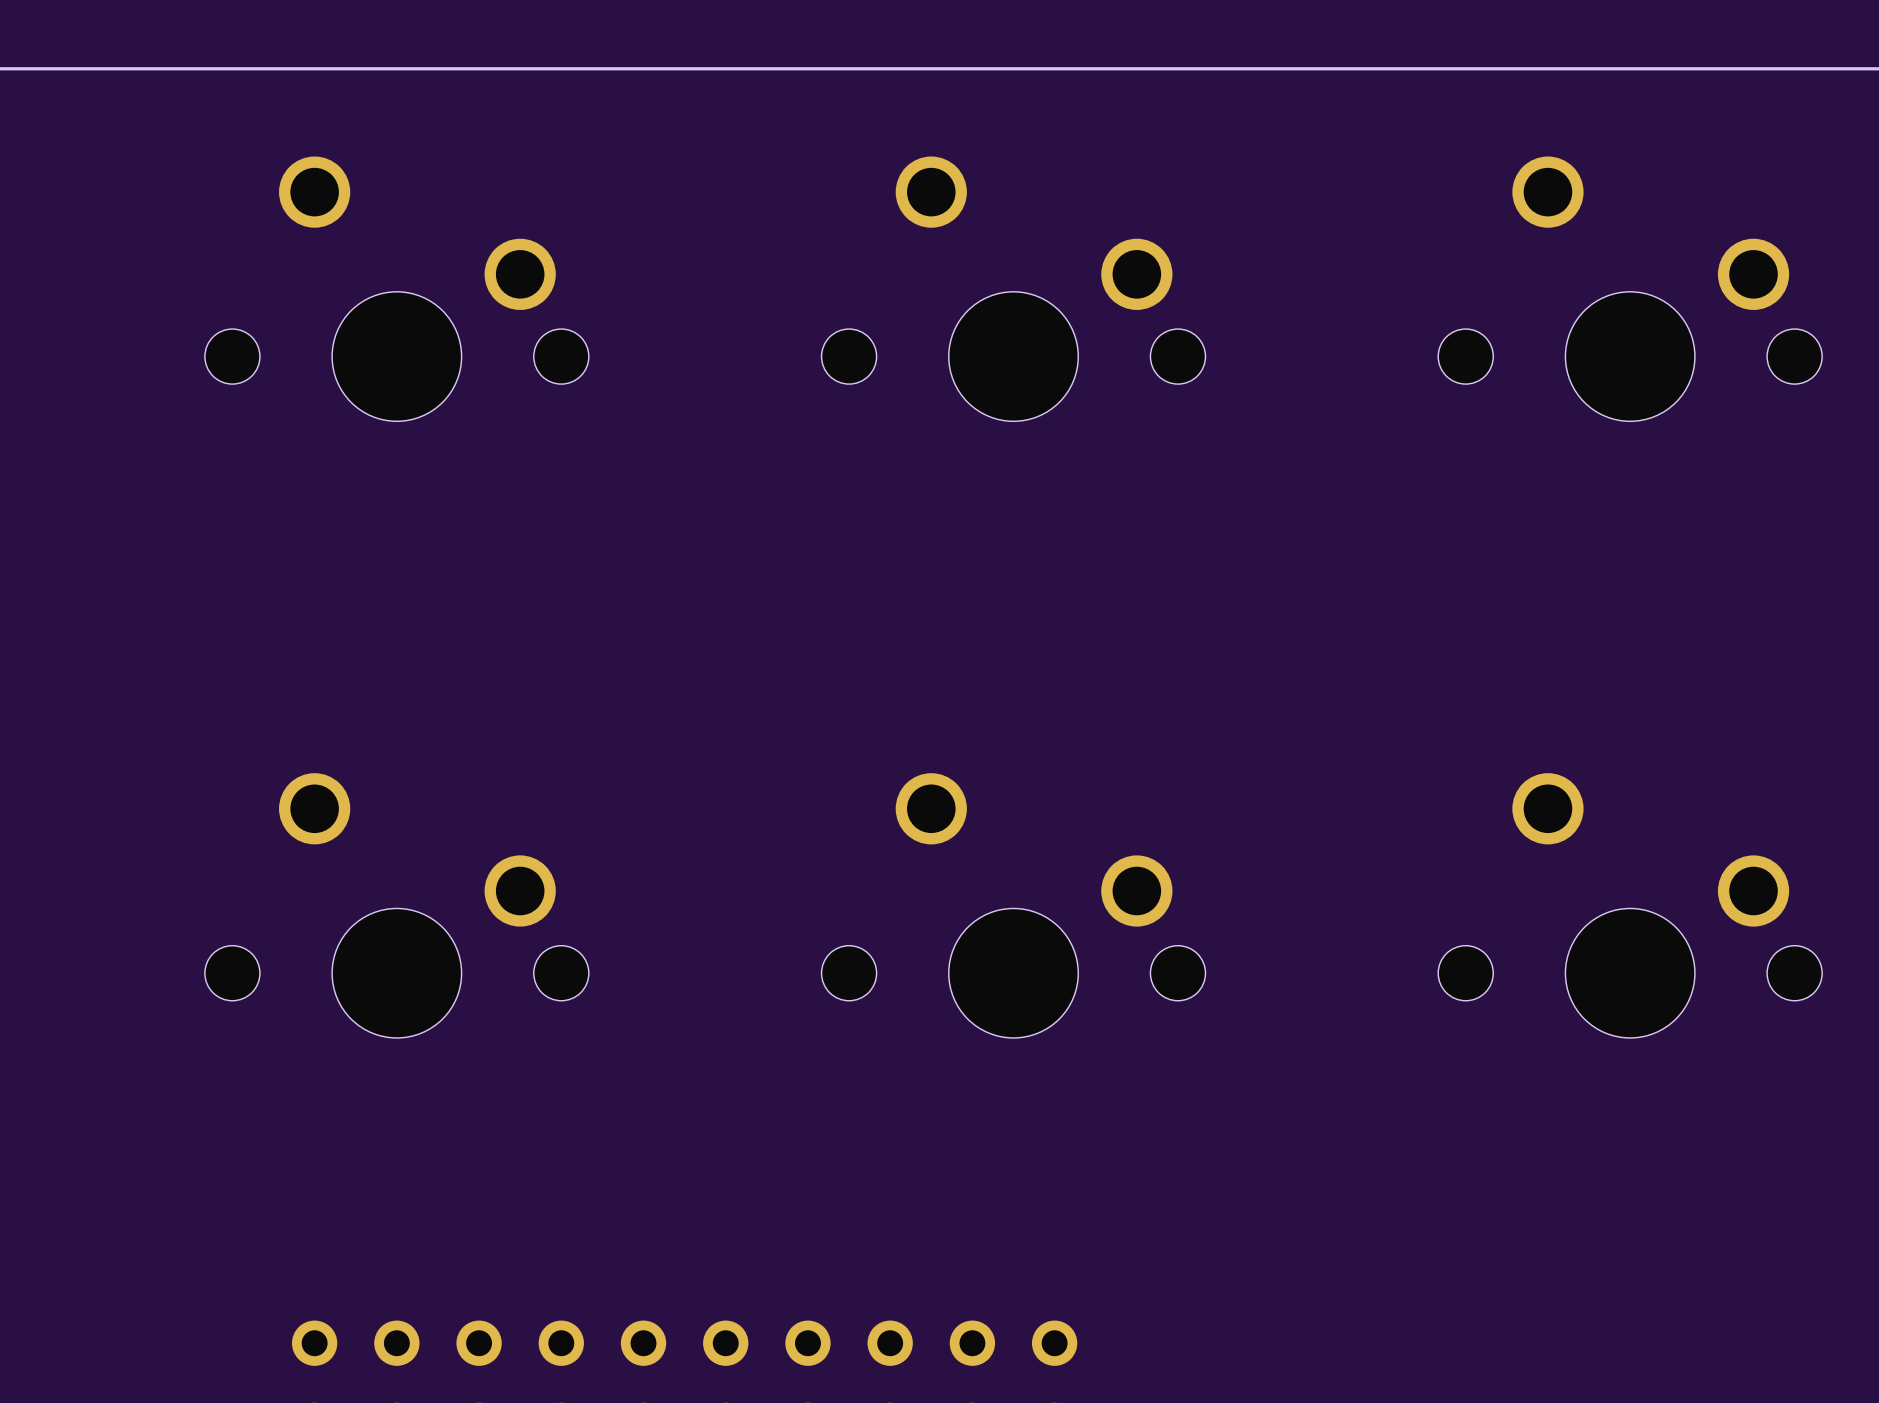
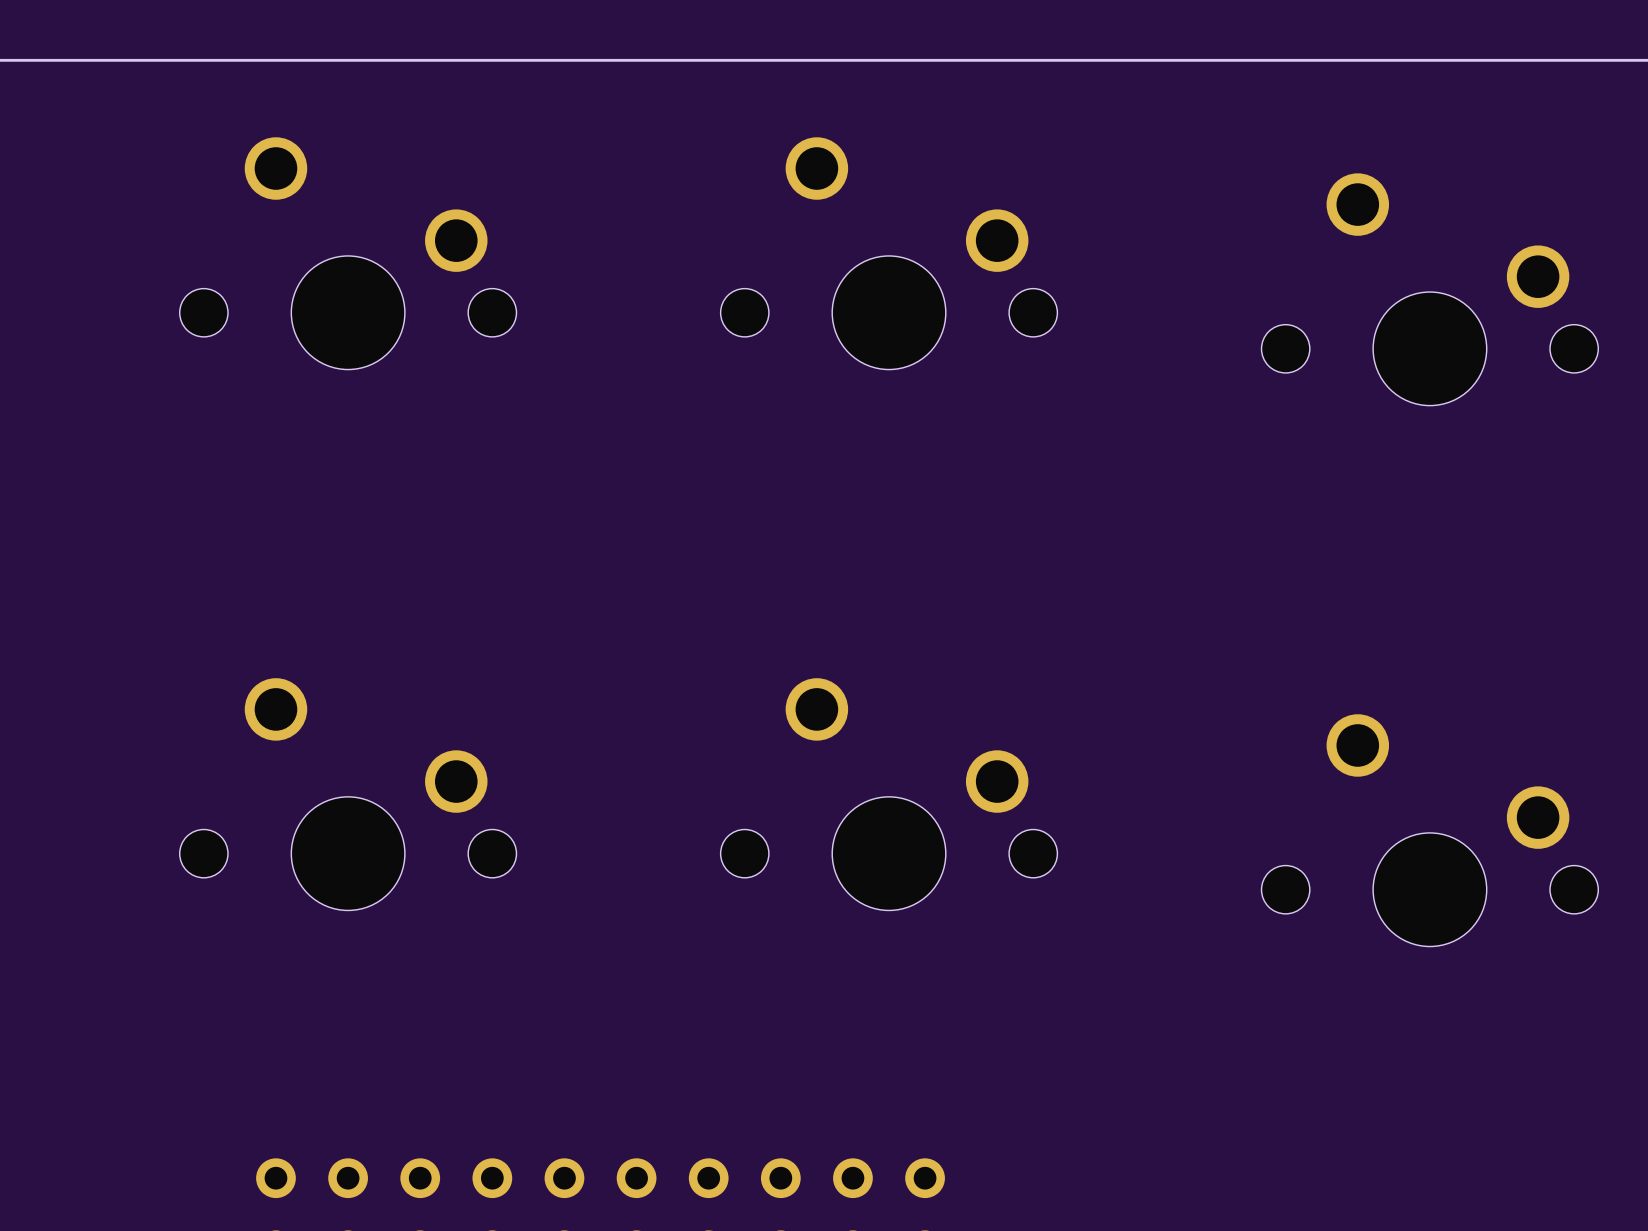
part position: (1630, 288) -> (1429, 289)
part position: (1630, 905) -> (1429, 830)

